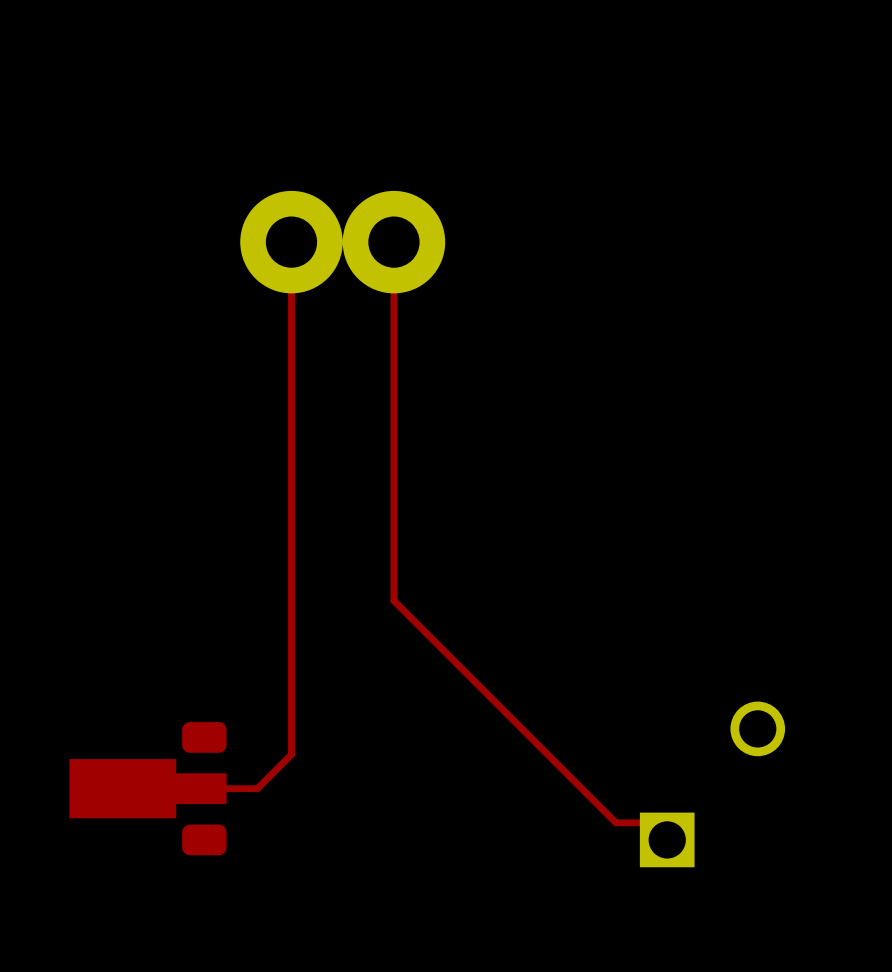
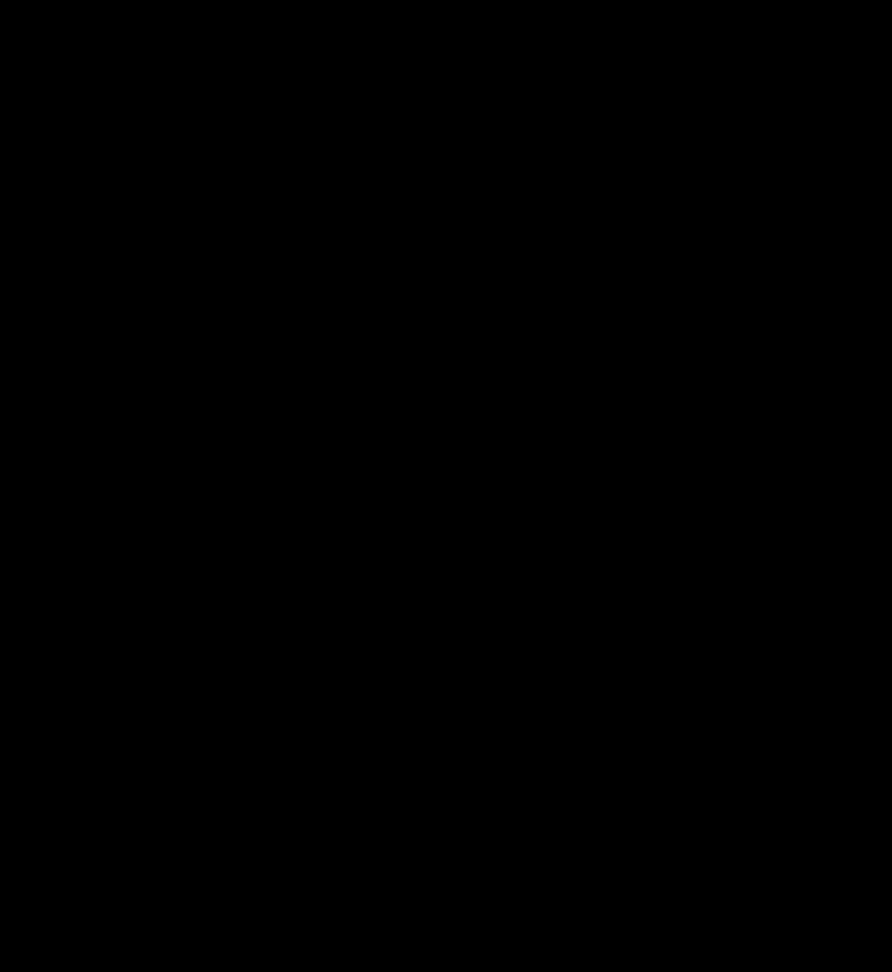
top track: (291, 242) (291, 754) (257, 788) (201, 788) -> none
part: (342, 242) -> none
top track: (393, 242) (393, 600) (615, 822) (667, 822) -> none
part: (712, 784) -> none
part: (148, 788) -> none

